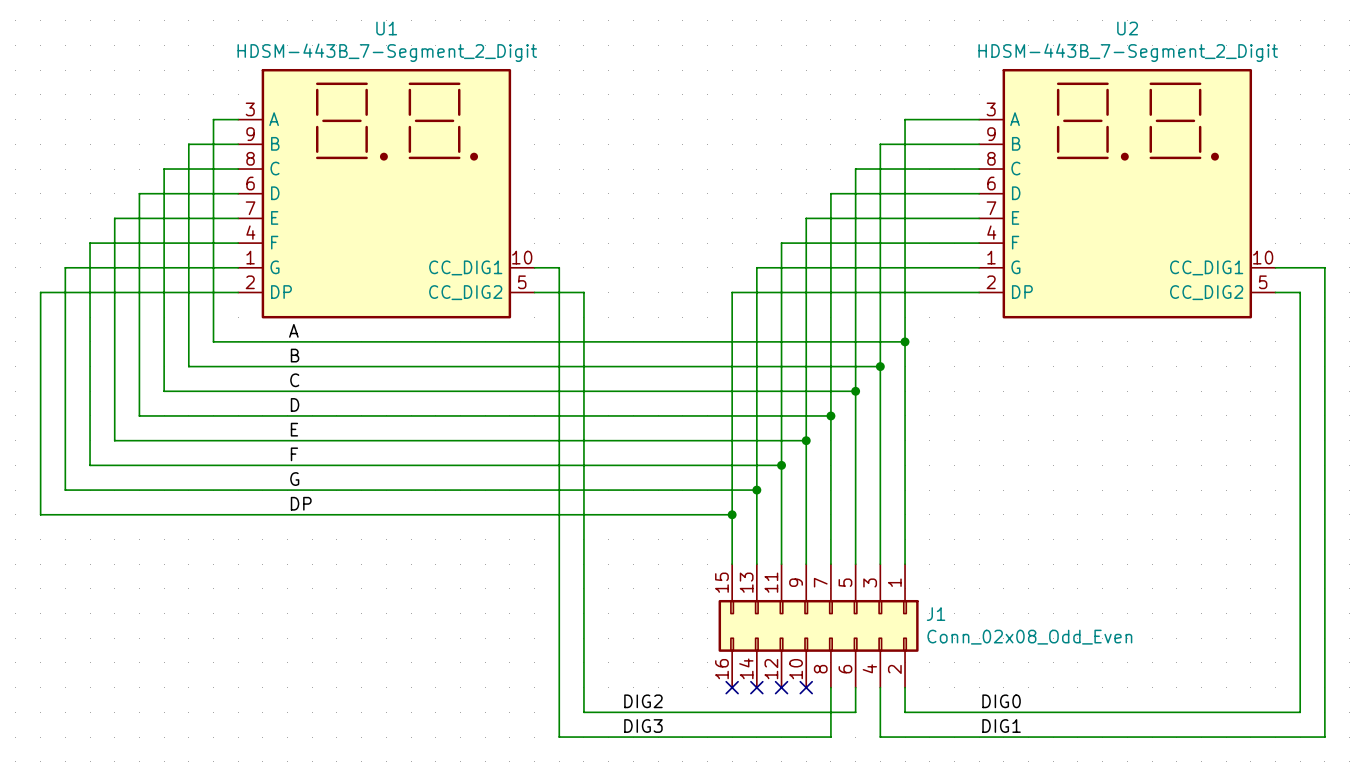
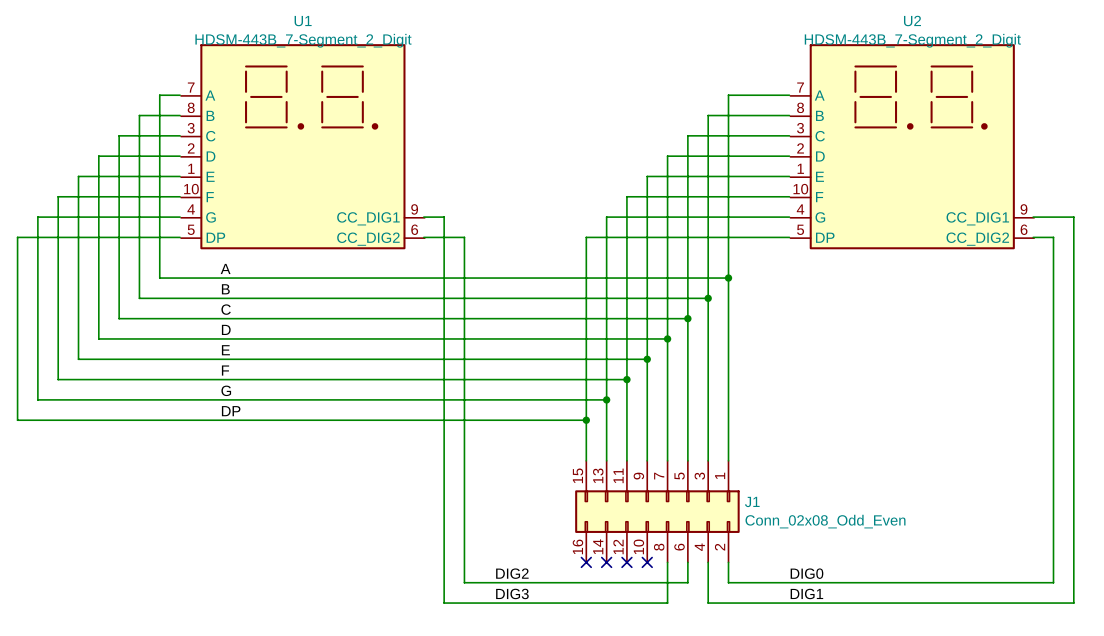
U1 symbol: [238, 68, 535, 319] -> [181, 44, 425, 250]
U2 symbol: [979, 68, 1276, 319] -> [790, 44, 1035, 250]

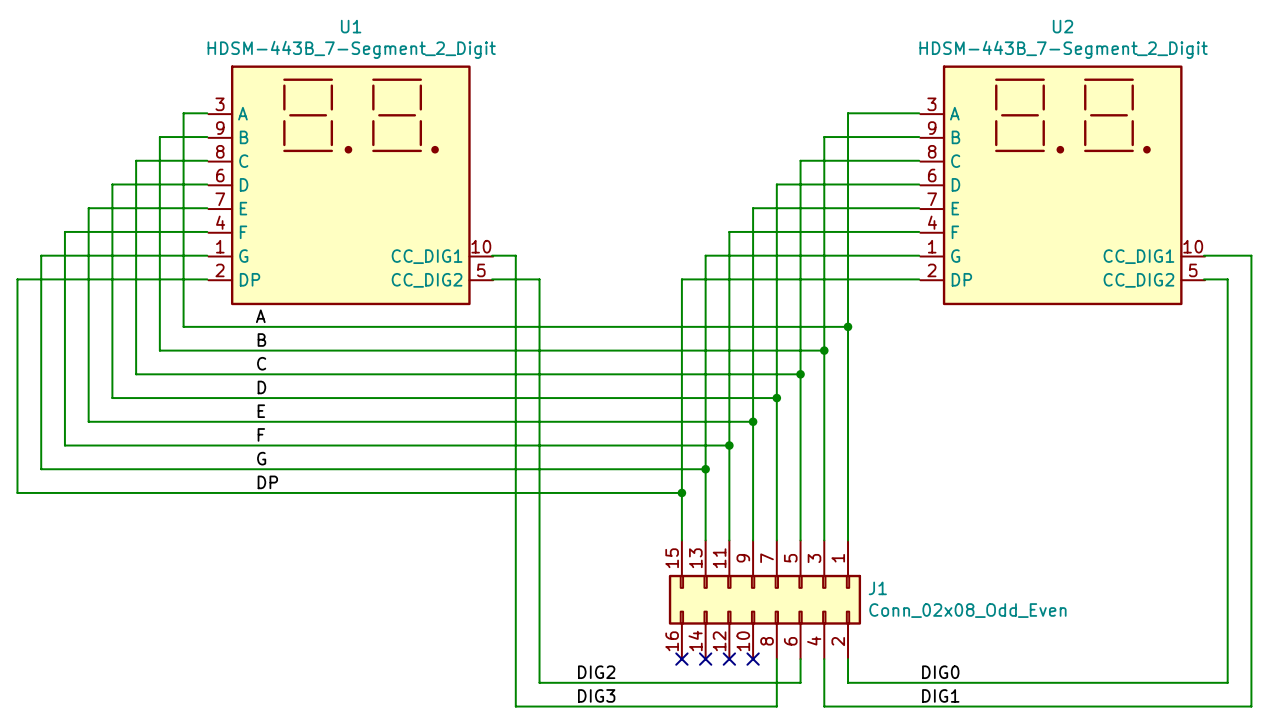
U1 symbol: [181, 44, 425, 250] -> [208, 65, 494, 306]
U2 symbol: [790, 44, 1035, 250] -> [920, 65, 1206, 306]

